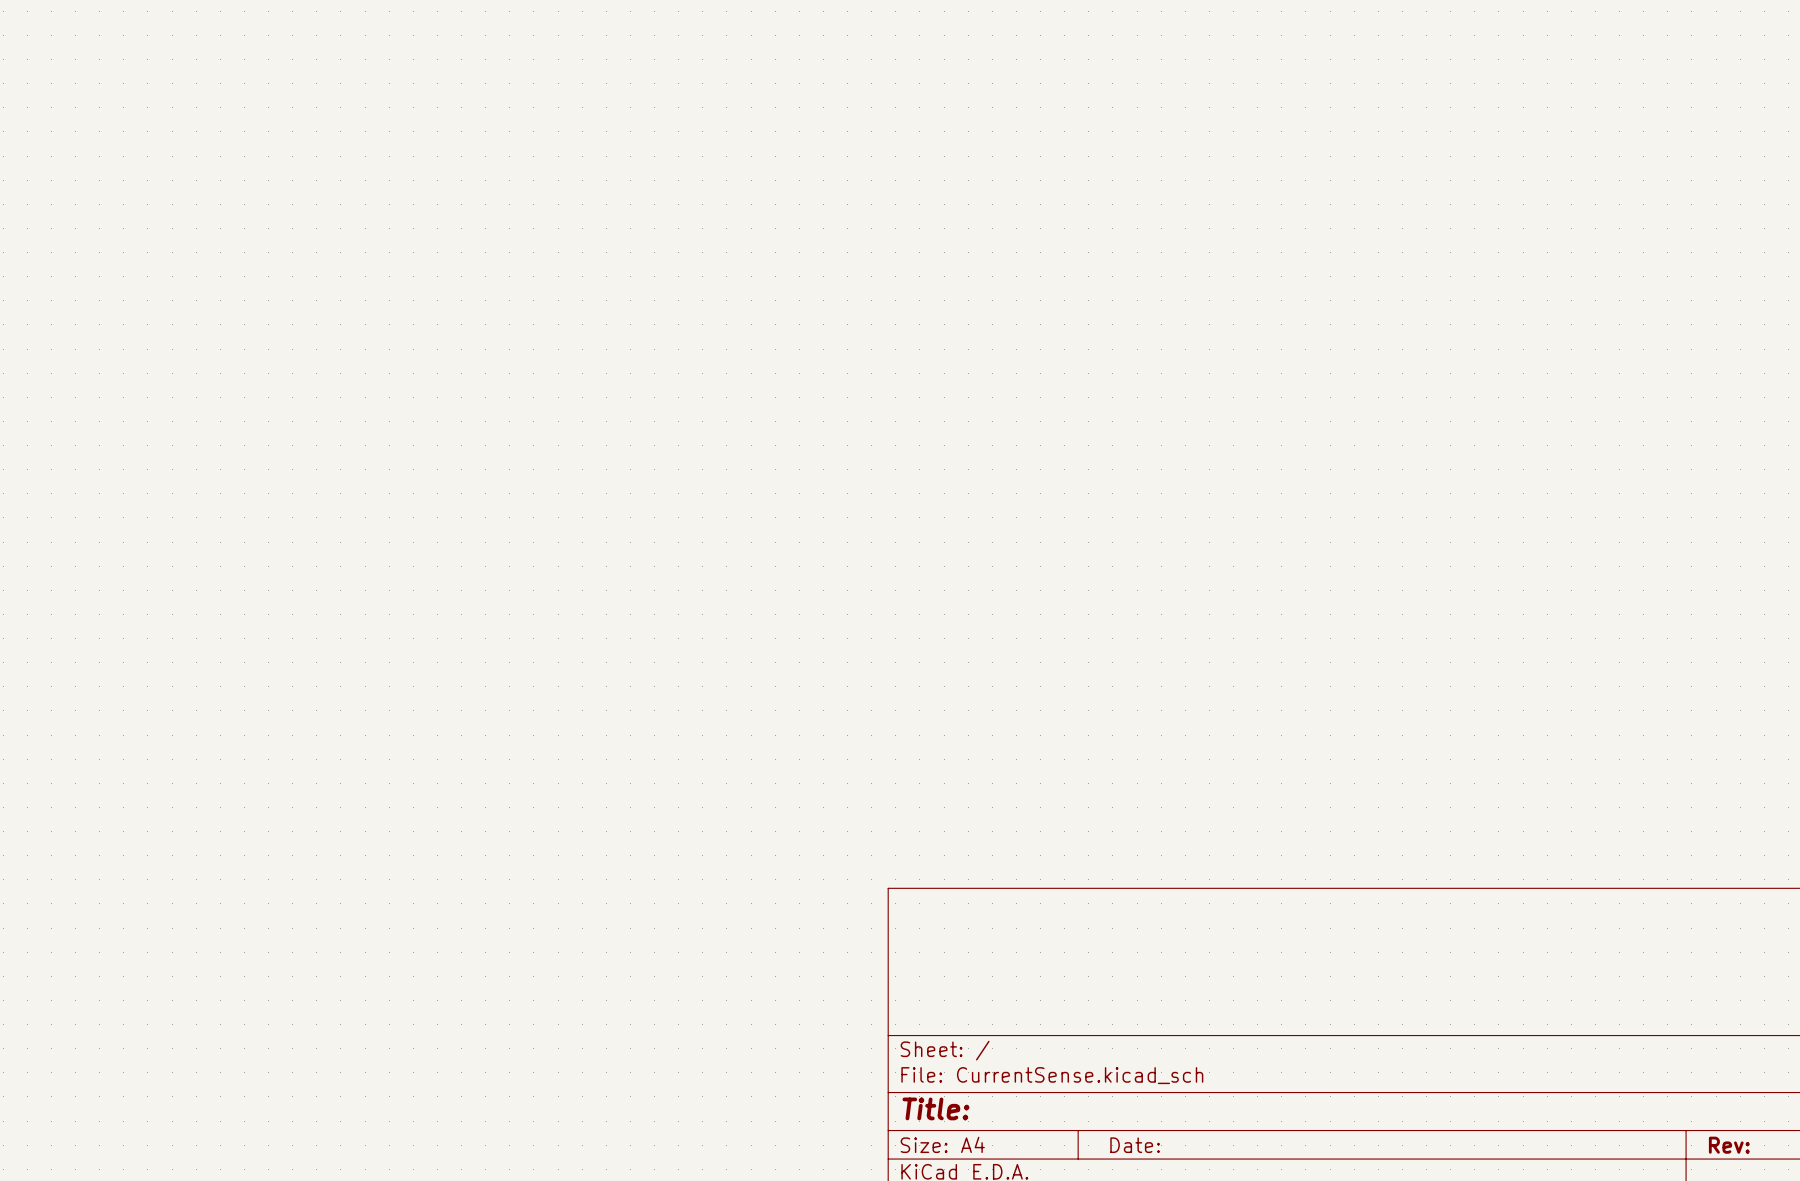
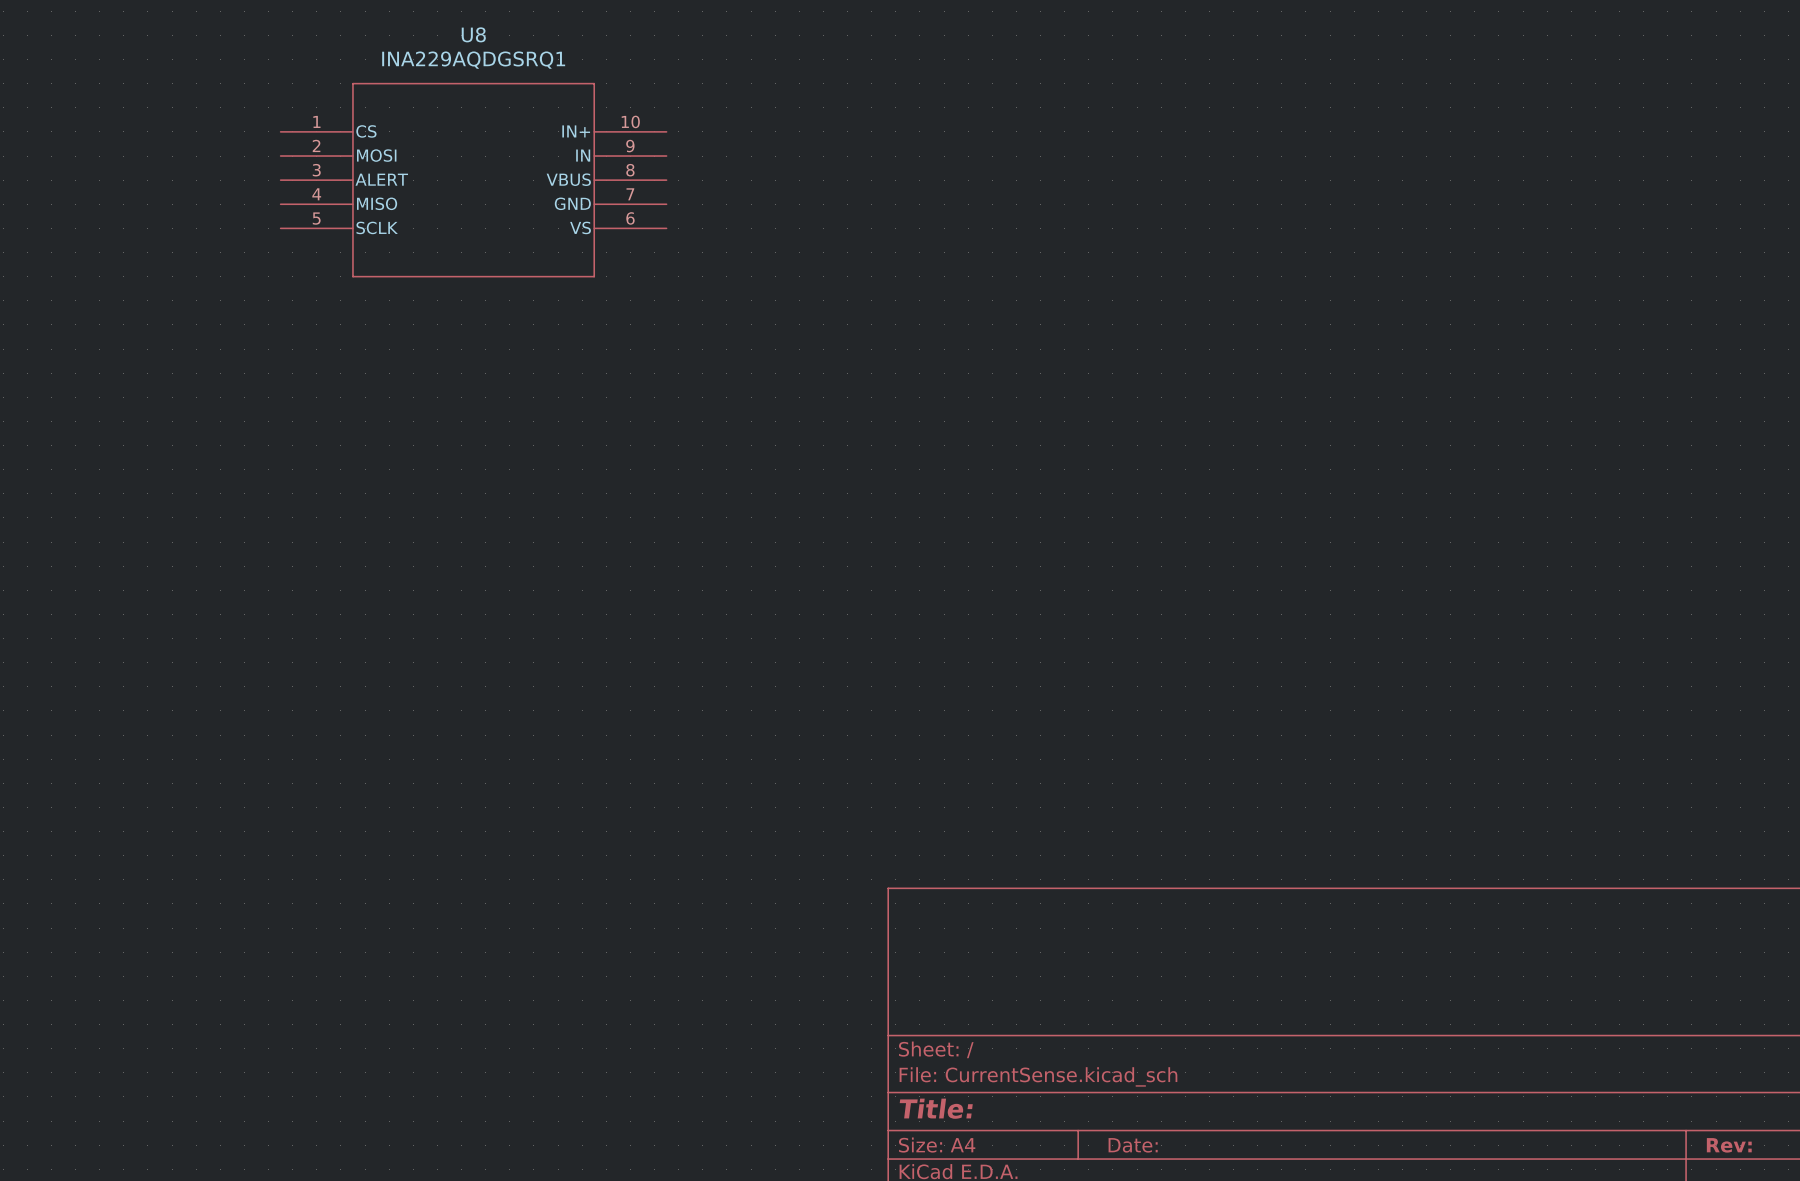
U8: none -> INA229AQDGSRQ1 (473, 180)

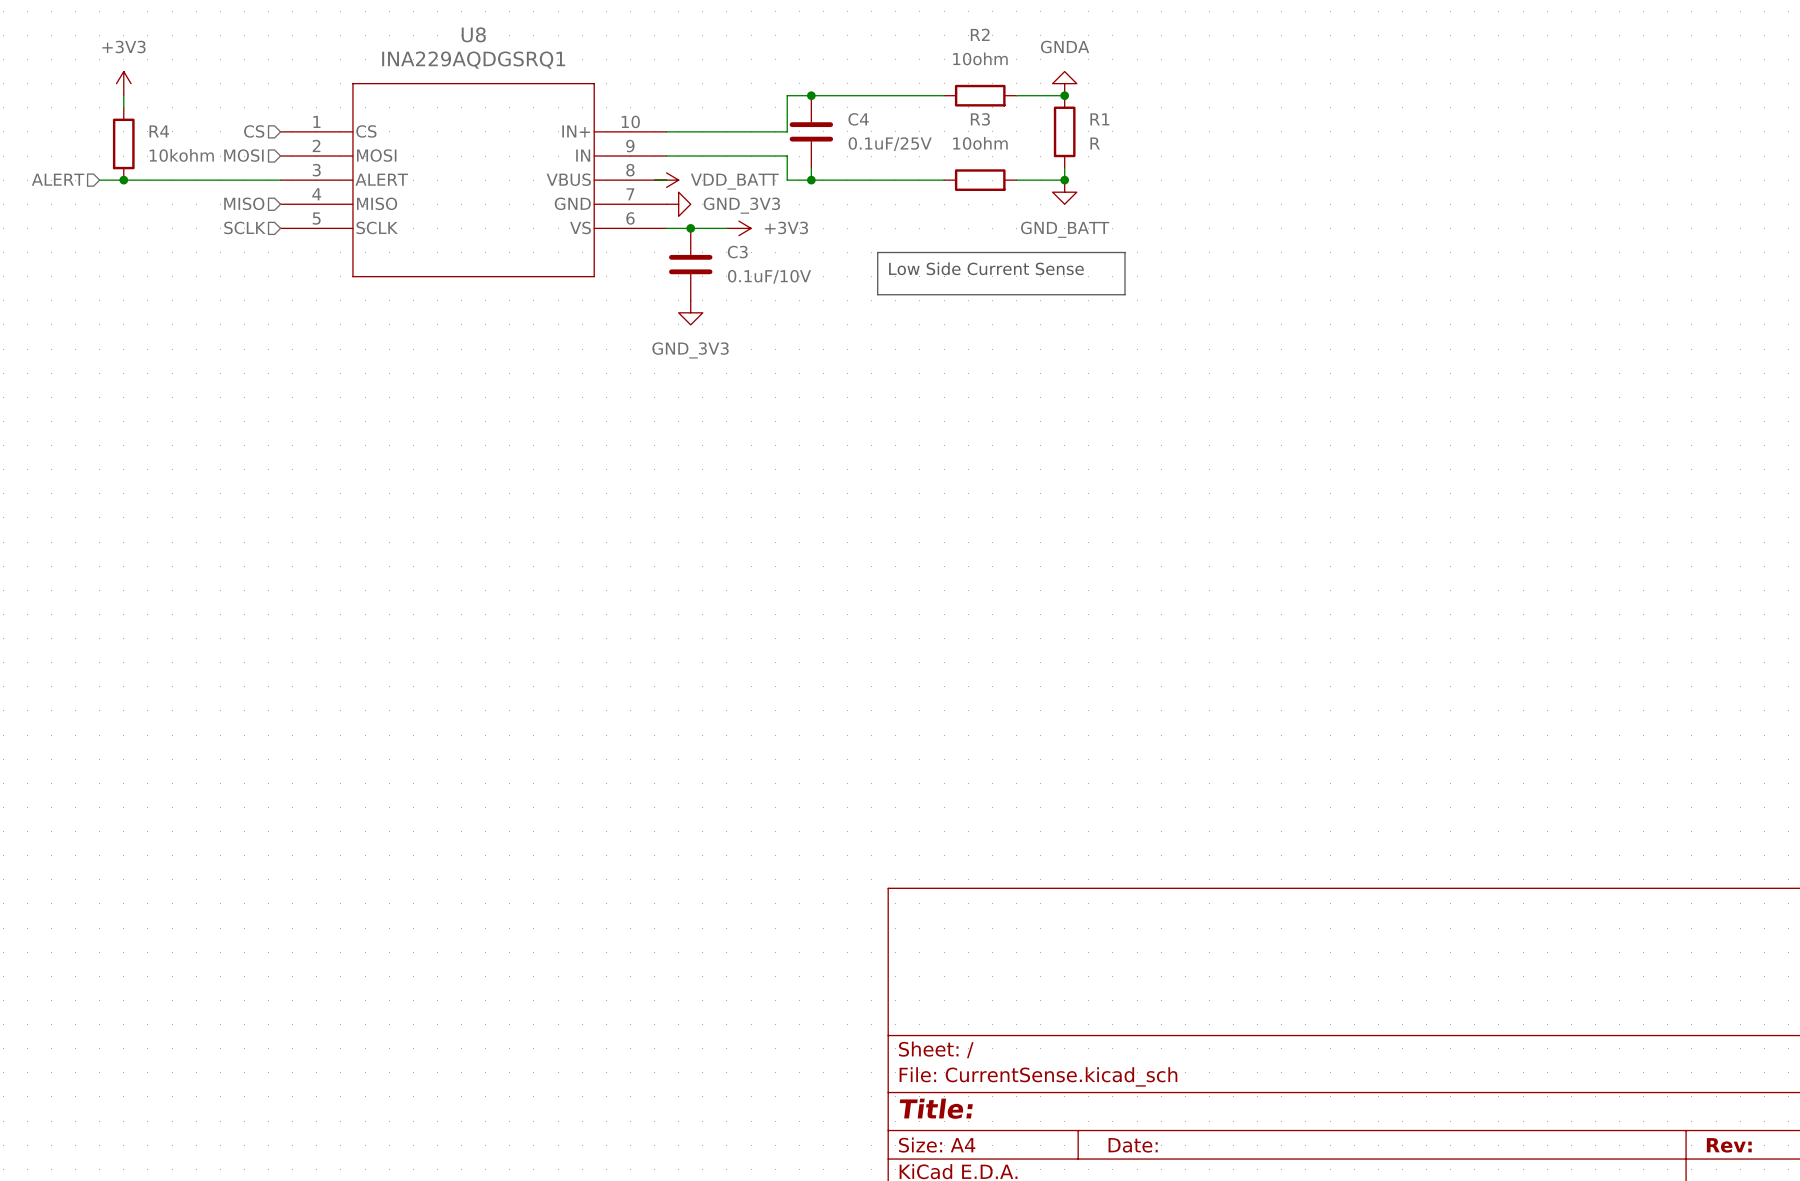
power symbol: none -> +3V3 (123, 83)
power symbol: none -> GNDA (1064, 83)
wire: none -> (123, 95) (123, 107)
junction: none -> (811, 95)
wire: none -> (944, 95) (787, 95) (787, 131) (666, 131)
R2: none -> 10ohm (980, 95)
wire: none -> (1016, 95) (1064, 95)
junction: none -> (1064, 95)
hierarchical label: none -> CS (254, 131)
C4: none -> 0.1uF/25V (811, 131)
R1: none -> R (1064, 131)
R4: none -> 10kohm (123, 143)
hierarchical label: none -> MOSI (243, 155)
wire: none -> (666, 156) (787, 156) (787, 180) (944, 180)
wire: none -> (811, 168) (811, 180)
wire: none -> (1064, 168) (1064, 180) (1016, 180)
hierarchical label: none -> ALERT (58, 179)
wire: none -> (99, 180) (280, 180)
junction: none -> (123, 180)
power symbol: none -> VDD_BATT (666, 180)
junction: none -> (811, 180)
R3: none -> 10ohm (980, 180)
junction: none -> (1064, 180)
power symbol: none -> GND_BATT (1064, 192)
hierarchical label: none -> MISO (244, 203)
power symbol: none -> GND_3V3 (678, 204)
hierarchical label: none -> SCLK (244, 227)
wire: none -> (666, 228) (726, 228)
junction: none -> (690, 228)
power symbol: none -> +3V3 (738, 228)
line: none -> (877, 252) (1124, 252) (1124, 294) (877, 294) (877, 252)
C3: none -> 0.1uF/10V (690, 264)
text: none -> Low Side Current Sense (986, 268)
power symbol: none -> GND_3V3 (690, 312)

